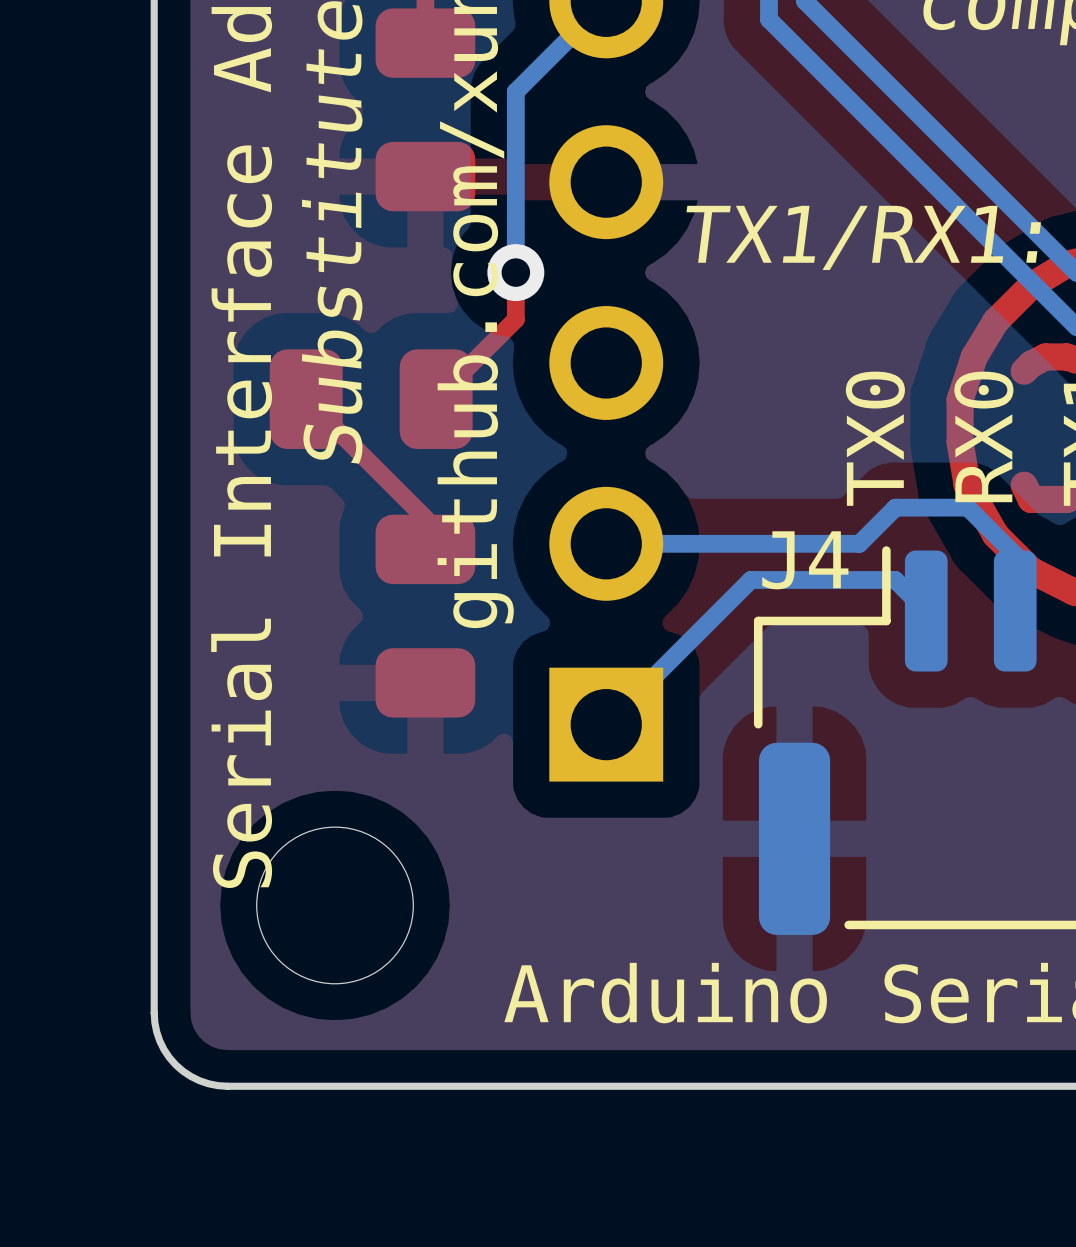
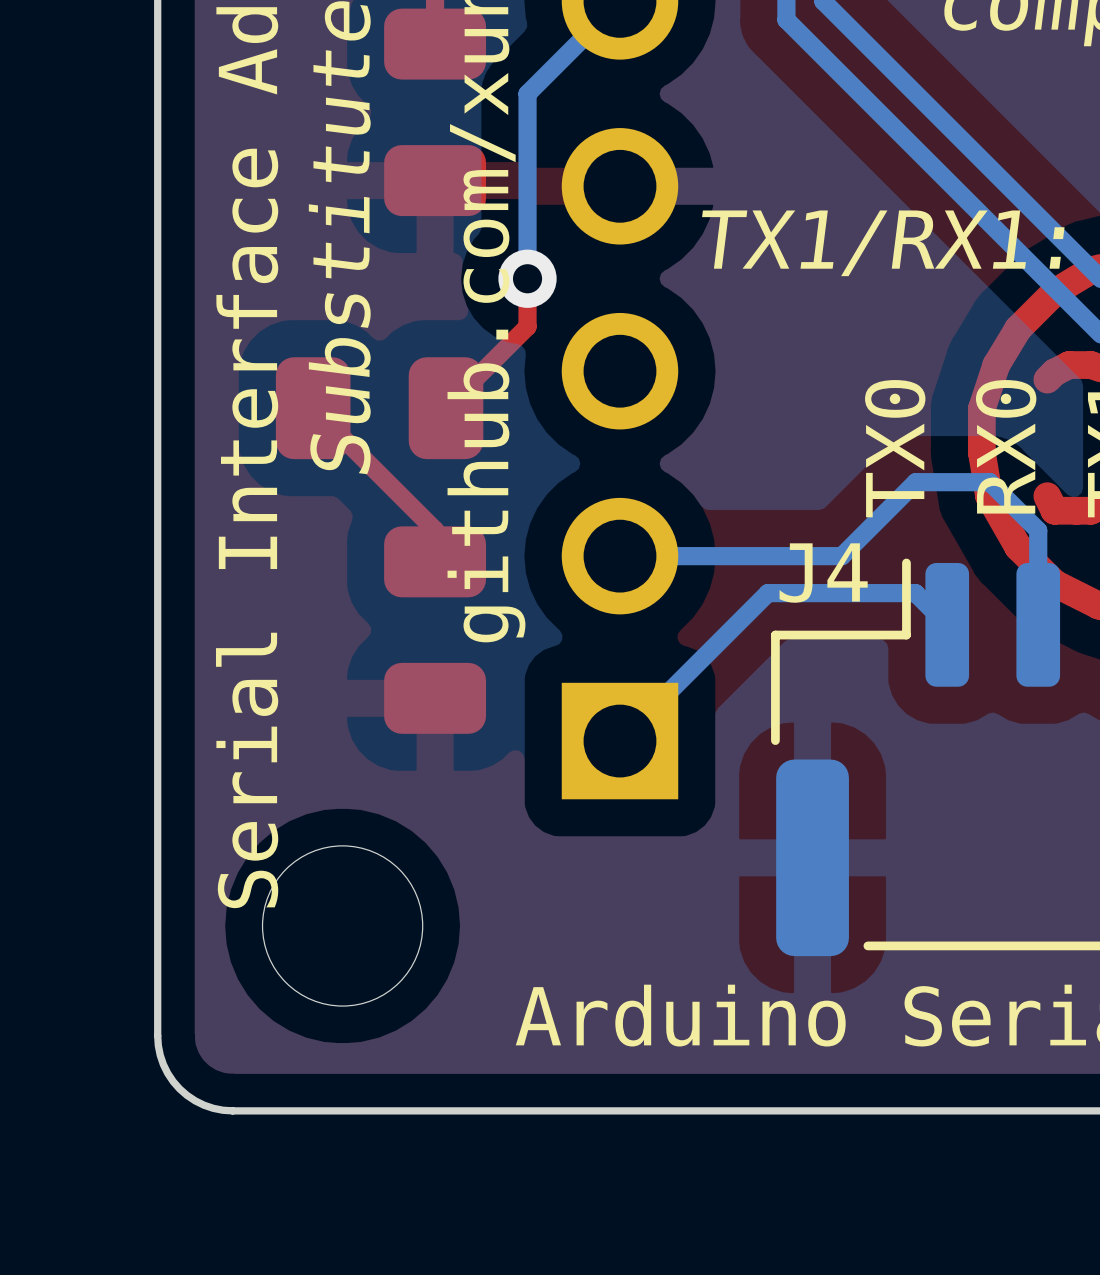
bottom track: (823, 543) (859, 543) (895, 507) (967, 507) (1015, 554) -> (841, 556) (915, 482) (989, 482) (1038, 530) (1038, 567)

